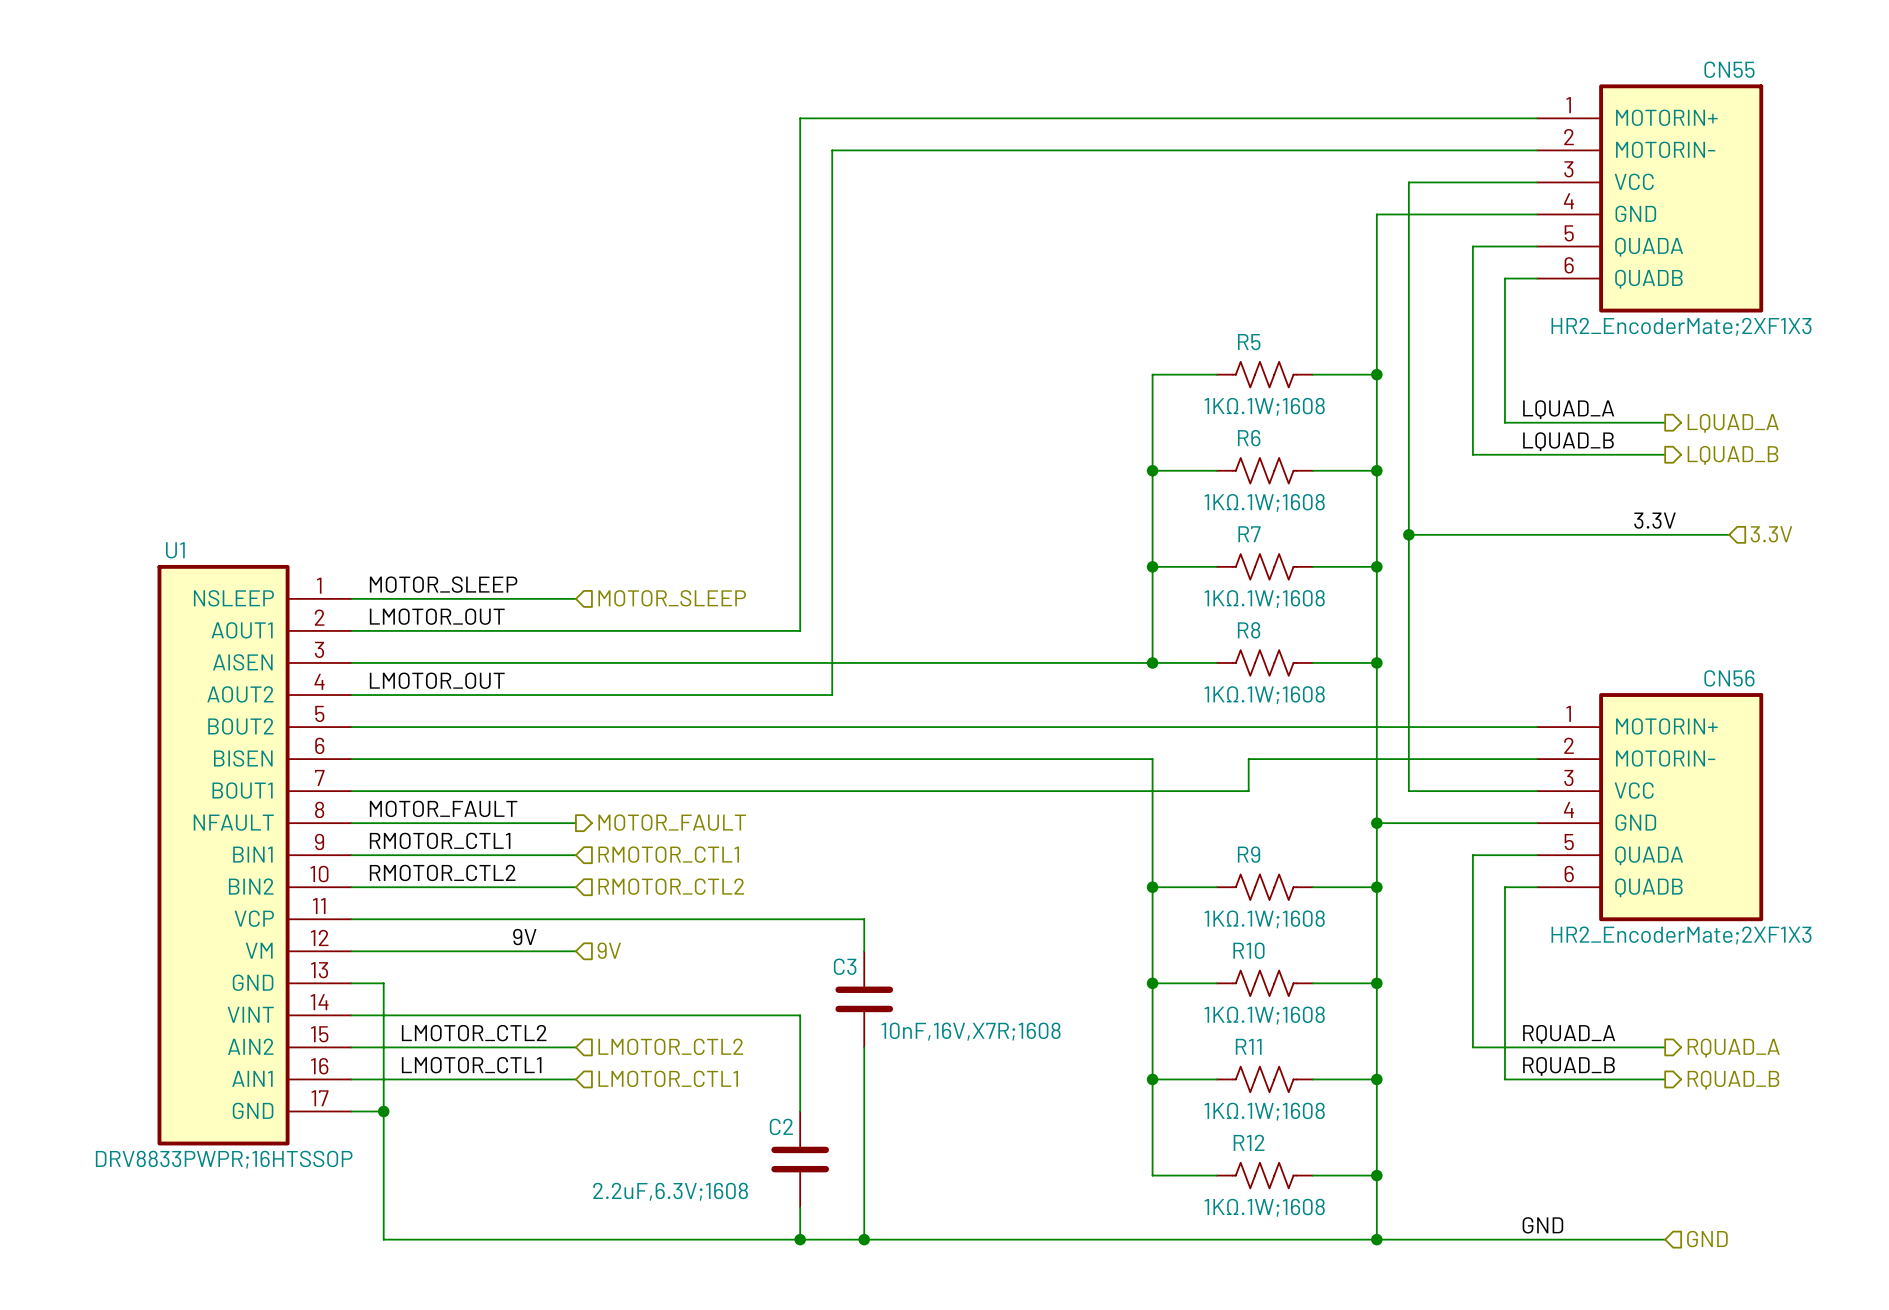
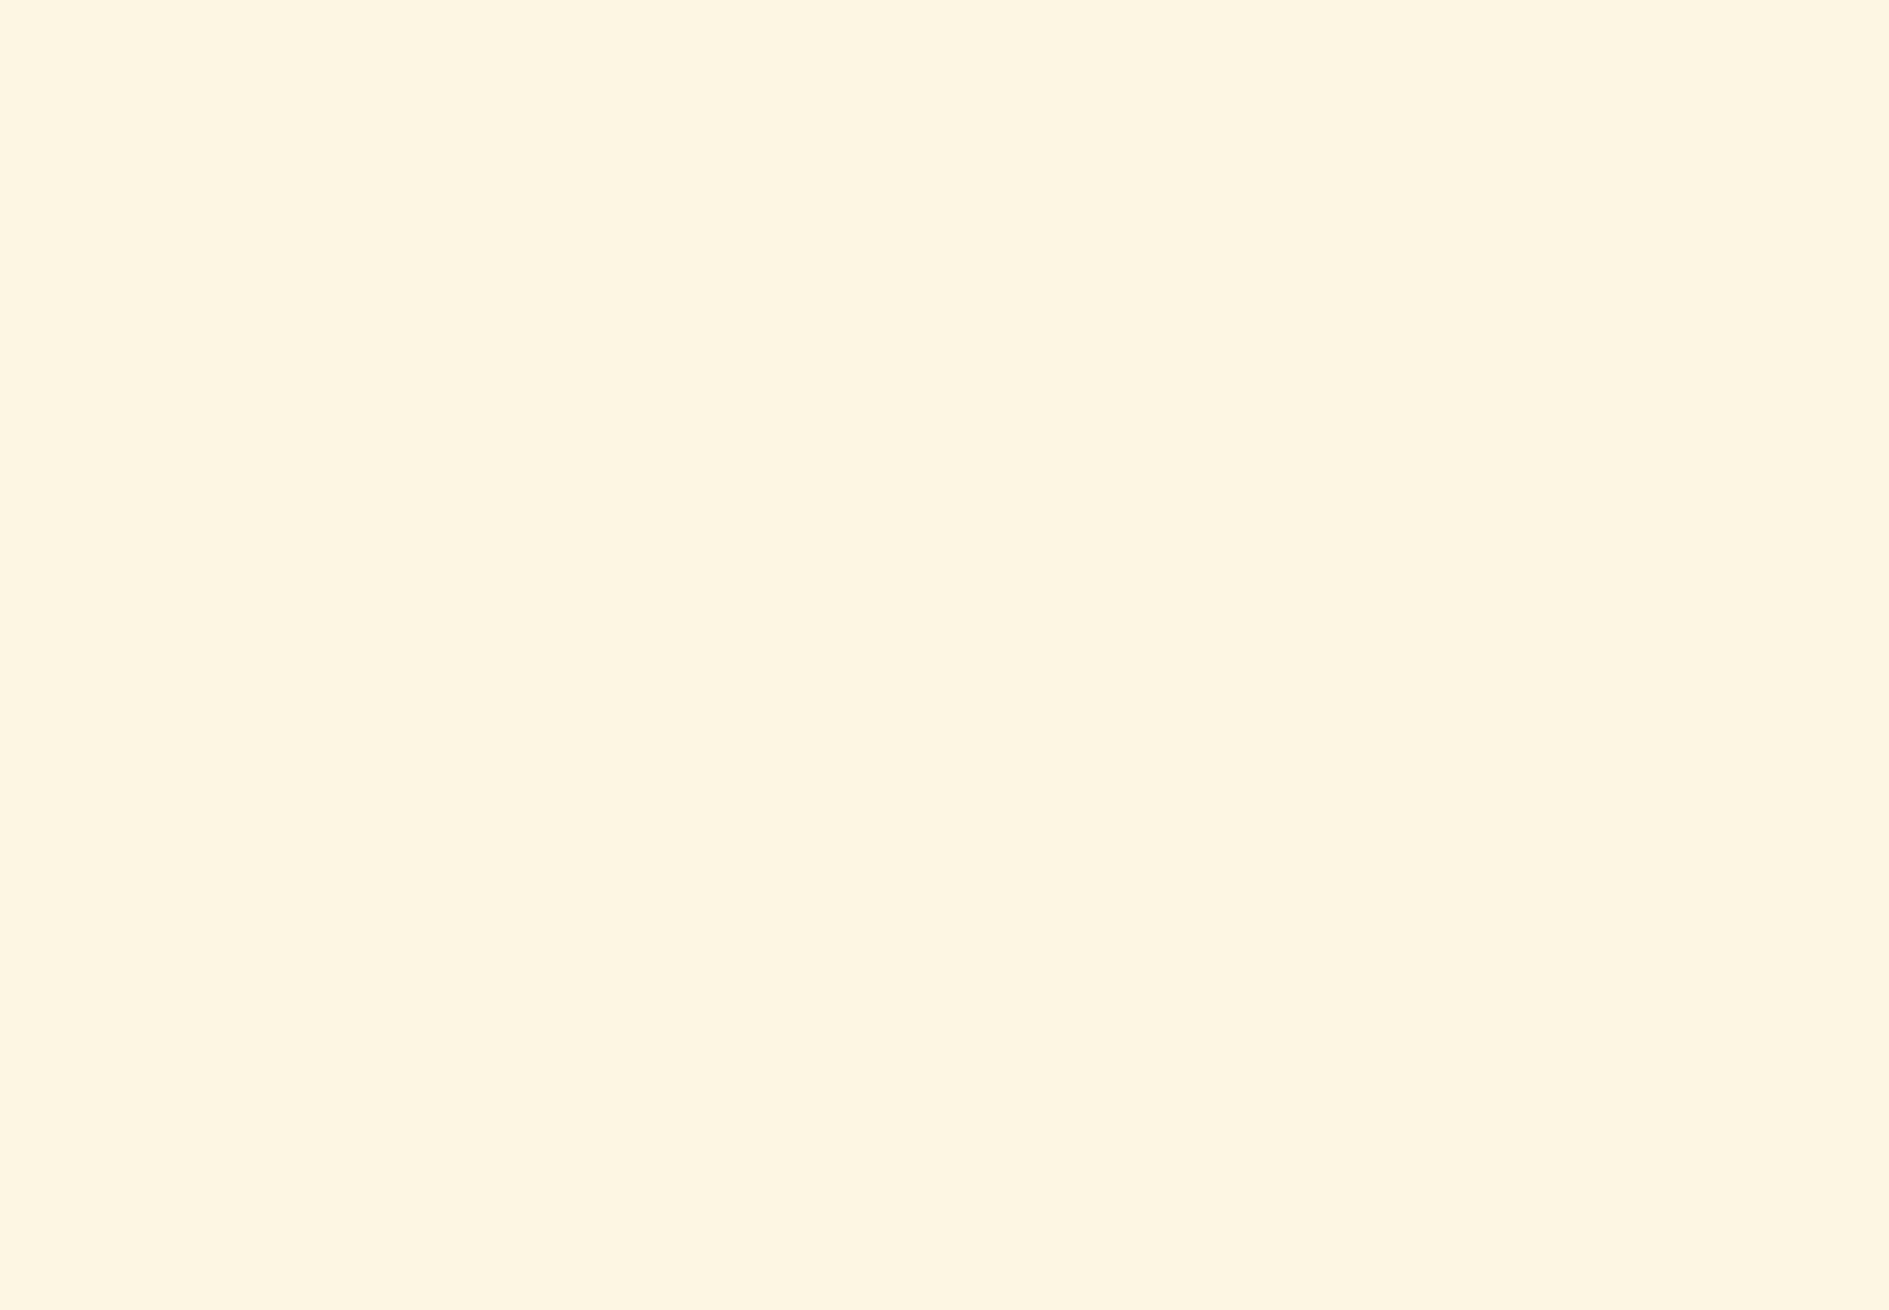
wire: (1537, 118) (800, 118) (800, 630) (351, 630) -> none
wire: (1537, 150) (832, 150) (832, 695) (351, 695) -> none
wire: (1537, 182) (1408, 182) (1408, 791) (1537, 791) -> none
CN55: HR2_EncoderMate;2XF1X3 (1650, 198) -> none
wire: (1537, 214) (1376, 214) (1376, 1239) -> none
wire: (1537, 246) (1472, 246) (1472, 454) (1665, 454) -> none
wire: (1537, 278) (1504, 278) (1504, 422) (1665, 422) -> none
wire: (1216, 374) (1152, 374) (1152, 662) -> none
R5: 1KΩ.1W;1608 (1264, 374) -> none
wire: (1312, 374) (1376, 374) -> none
junction: (1376, 374) -> none
label: LQUAD_A (1568, 409) -> none
hierarchical label: LQUAD_A (1733, 423) -> none
label: LQUAD_B (1568, 441) -> none
hierarchical label: LQUAD_B (1732, 455) -> none
wire: (1152, 470) (1216, 470) -> none
junction: (1152, 470) -> none
R6: 1KΩ.1W;1608 (1264, 470) -> none
wire: (1312, 470) (1376, 470) -> none
junction: (1376, 470) -> none
label: 3.3V (1655, 520) -> none
wire: (1408, 534) (1729, 534) -> none
junction: (1408, 534) -> none
hierarchical label: 3.3V (1771, 534) -> none
wire: (1152, 566) (1216, 566) -> none
junction: (1152, 566) -> none
R7: 1KΩ.1W;1608 (1264, 566) -> none
wire: (1312, 566) (1376, 566) -> none
junction: (1376, 566) -> none
label: MOTOR_SLEEP (443, 584) -> none
wire: (351, 598) (575, 598) -> none
hierarchical label: MOTOR_SLEEP (672, 598) -> none
label: LMOTOR_OUT (437, 616) -> none
wire: (351, 662) (1216, 662) -> none
junction: (1152, 662) -> none
R8: 1KΩ.1W;1608 (1264, 662) -> none
wire: (1312, 662) (1376, 662) -> none
junction: (1376, 662) -> none
label: LMOTOR_OUT (437, 680) -> none
wire: (351, 727) (1537, 727) -> none
wire: (351, 759) (1152, 759) (1152, 1175) (1216, 1175) -> none
wire: (1537, 759) (1248, 759) (1248, 791) (351, 791) -> none
CN56: HR2_EncoderMate;2XF1X3 (1650, 807) -> none
label: MOTOR_FAULT (443, 808) -> none
hierarchical label: MOTOR_FAULT (672, 822) -> none
wire: (351, 823) (575, 823) -> none
wire: (1376, 823) (1537, 823) -> none
junction: (1376, 823) -> none
label: RMOTOR_CTL1 (440, 840) -> none
hierarchical label: RMOTOR_CTL1 (668, 854) -> none
U1: DRV8833PWPR;16HTSSOP (254, 855) -> none
wire: (351, 855) (575, 855) -> none
wire: (1537, 855) (1472, 855) (1472, 1047) (1665, 1047) -> none
label: RMOTOR_CTL2 (442, 872) -> none
hierarchical label: RMOTOR_CTL2 (671, 886) -> none
wire: (351, 887) (575, 887) -> none
wire: (1152, 887) (1216, 887) -> none
junction: (1152, 887) -> none
R9: 1KΩ.1W;1608 (1264, 887) -> none
wire: (1312, 887) (1376, 887) -> none
junction: (1376, 887) -> none
wire: (1537, 887) (1504, 887) (1504, 1079) (1665, 1079) -> none
wire: (351, 919) (864, 919) (864, 951) -> none
label: 9V (524, 937) -> none
hierarchical label: 9V (609, 950) -> none
wire: (351, 951) (575, 951) -> none
wire: (351, 983) (383, 983) (383, 1239) (1665, 1239) -> none
wire: (1152, 983) (1216, 983) -> none
junction: (1152, 983) -> none
R10: 1KΩ.1W;1608 (1264, 983) -> none
wire: (1312, 983) (1376, 983) -> none
junction: (1376, 983) -> none
C3: 10nF,16V,X7R;1608 (864, 999) -> none
wire: (351, 1015) (800, 1015) (800, 1111) -> none
label: LMOTOR_CTL2 (474, 1033) -> none
label: RQUAD_A (1569, 1034) -> none
hierarchical label: LMOTOR_CTL2 (670, 1046) -> none
wire: (351, 1047) (575, 1047) -> none
wire: (864, 1047) (864, 1239) -> none
hierarchical label: RQUAD_A (1733, 1048) -> none
label: LMOTOR_CTL1 (471, 1065) -> none
label: RQUAD_B (1568, 1066) -> none
hierarchical label: LMOTOR_CTL1 (668, 1078) -> none
wire: (351, 1079) (575, 1079) -> none
wire: (1152, 1079) (1216, 1079) -> none
junction: (1152, 1079) -> none
R11: 1KΩ.1W;1608 (1264, 1079) -> none
wire: (1312, 1079) (1376, 1079) -> none
junction: (1376, 1079) -> none
hierarchical label: RQUAD_B (1733, 1080) -> none
wire: (351, 1111) (383, 1111) -> none
junction: (383, 1111) -> none
C2: 2.2uF,6.3V;1608 (800, 1159) -> none
R12: 1KΩ.1W;1608 (1264, 1175) -> none
wire: (1312, 1175) (1376, 1175) -> none
junction: (1376, 1175) -> none
wire: (800, 1207) (800, 1239) -> none
label: GND (1542, 1225) -> none
junction: (800, 1239) -> none
junction: (864, 1239) -> none
junction: (1376, 1239) -> none
hierarchical label: GND (1707, 1239) -> none

